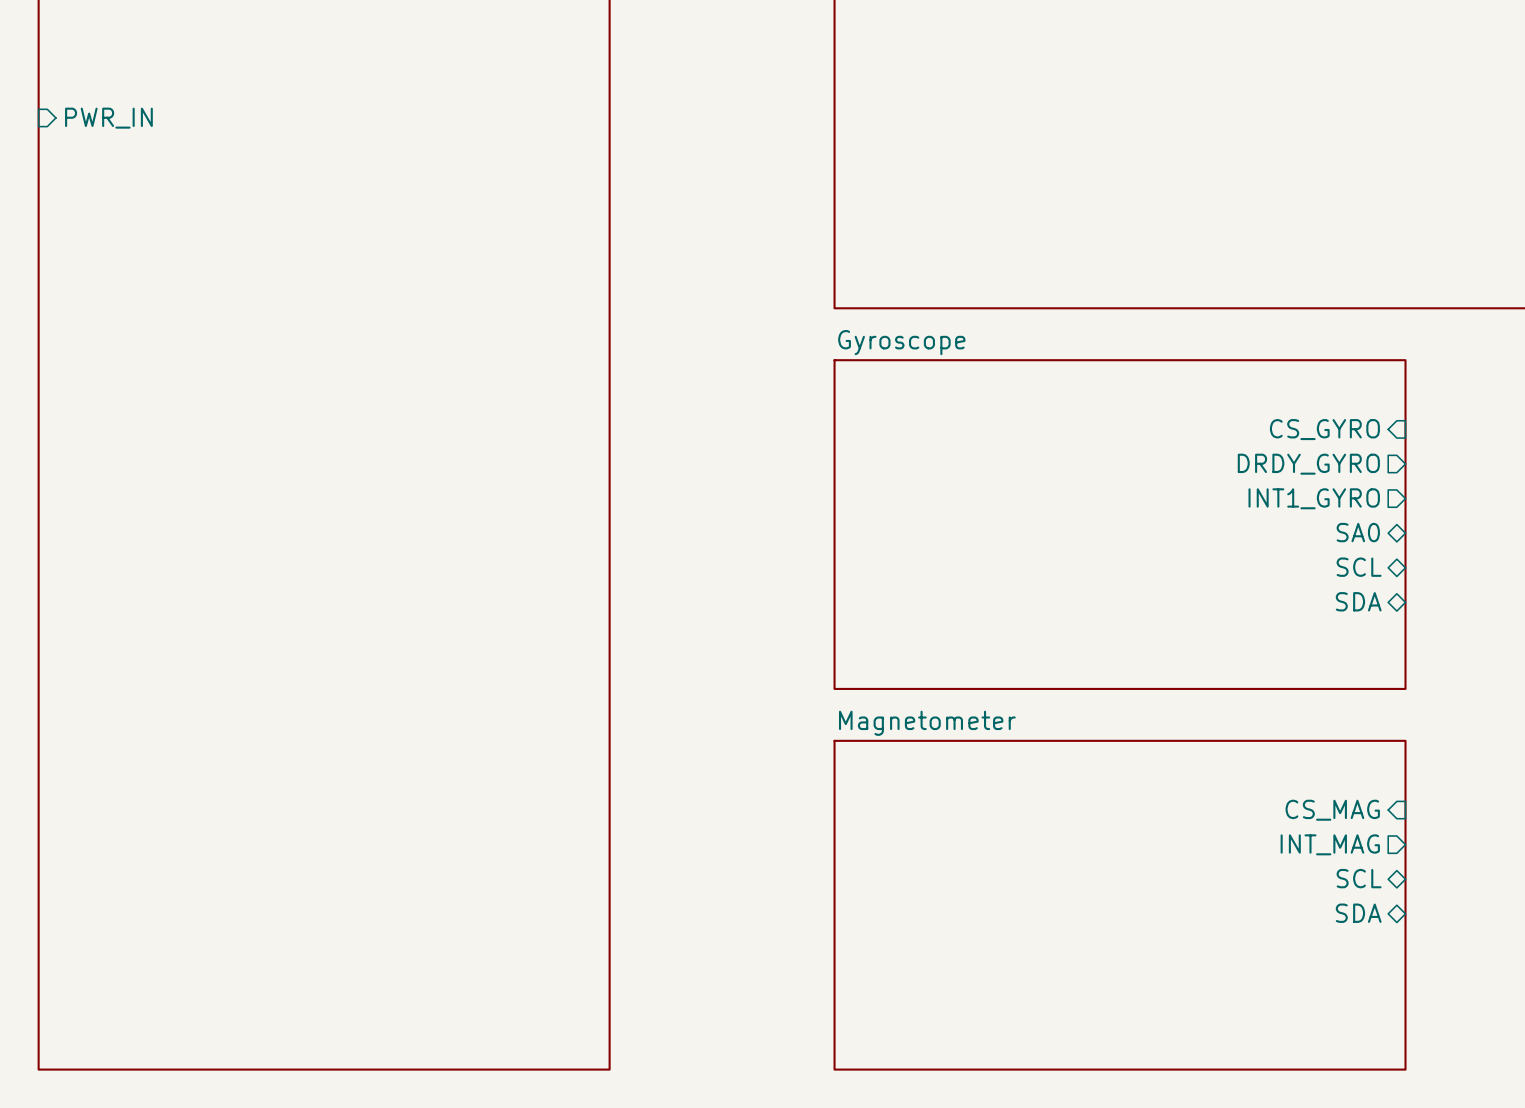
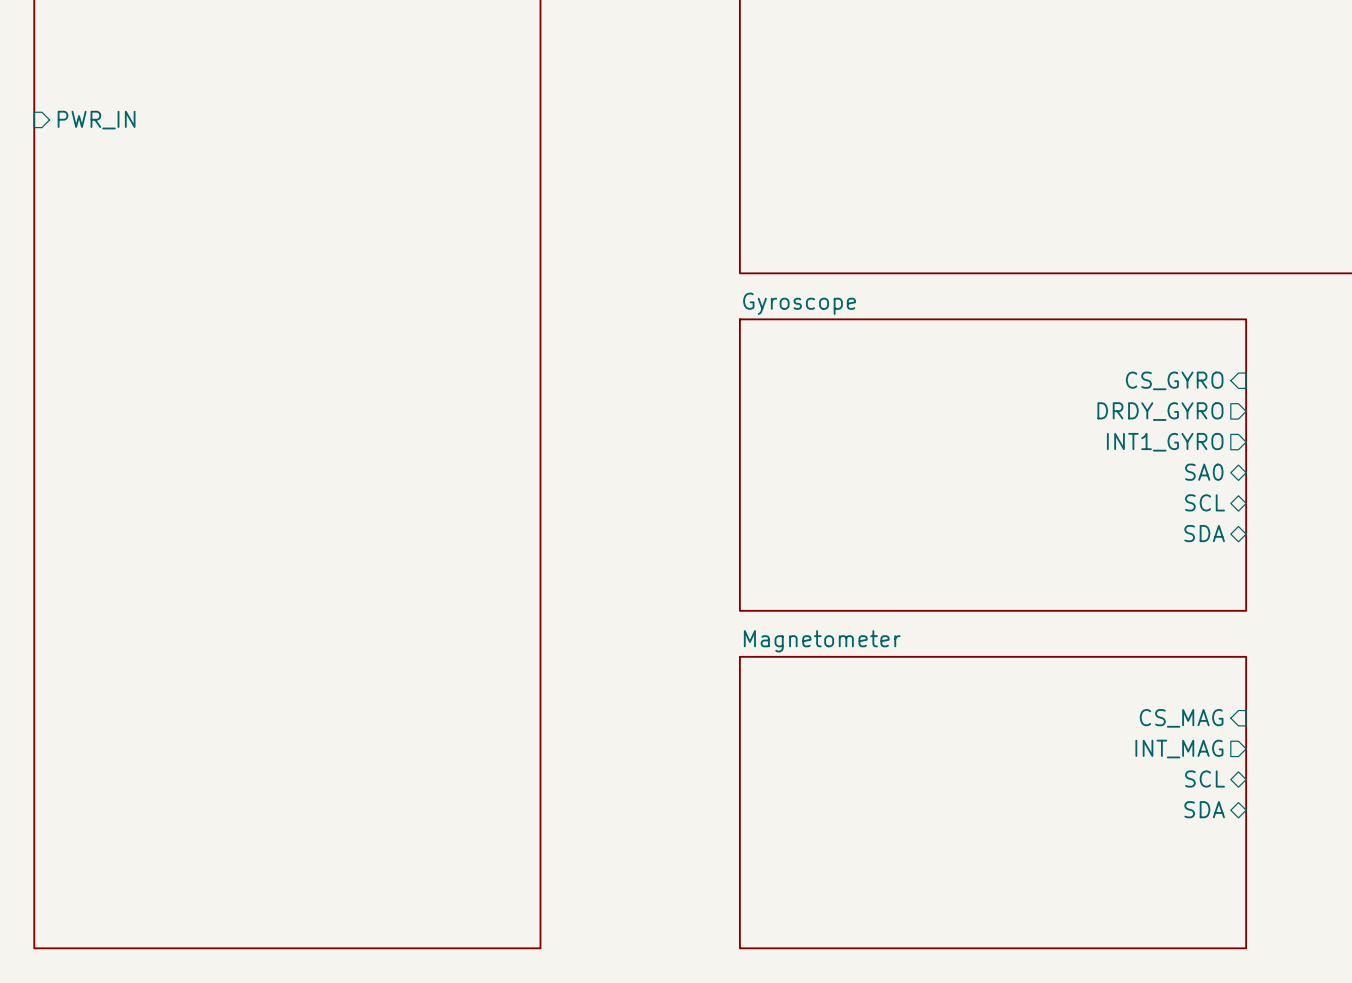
sheet pin position: PWR_IN (108, 118) -> PWR_IN (96, 120)

